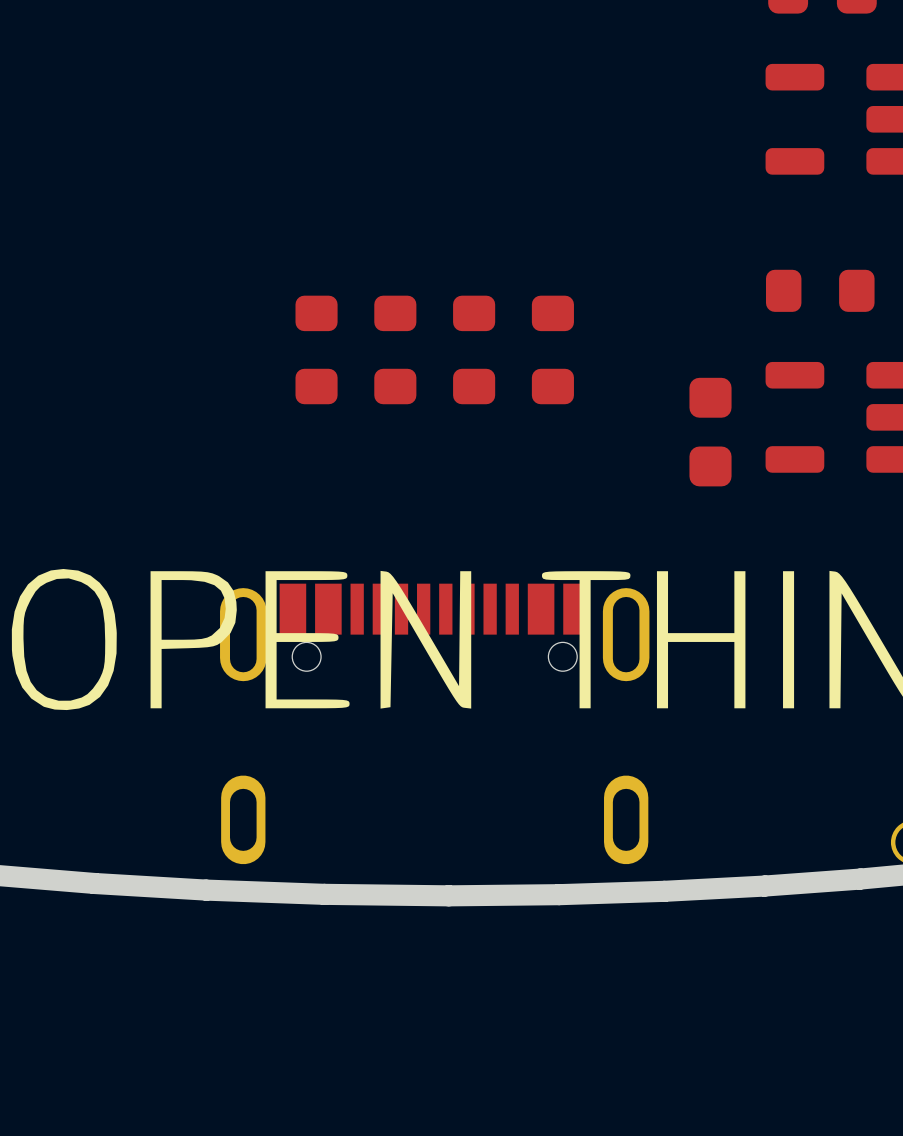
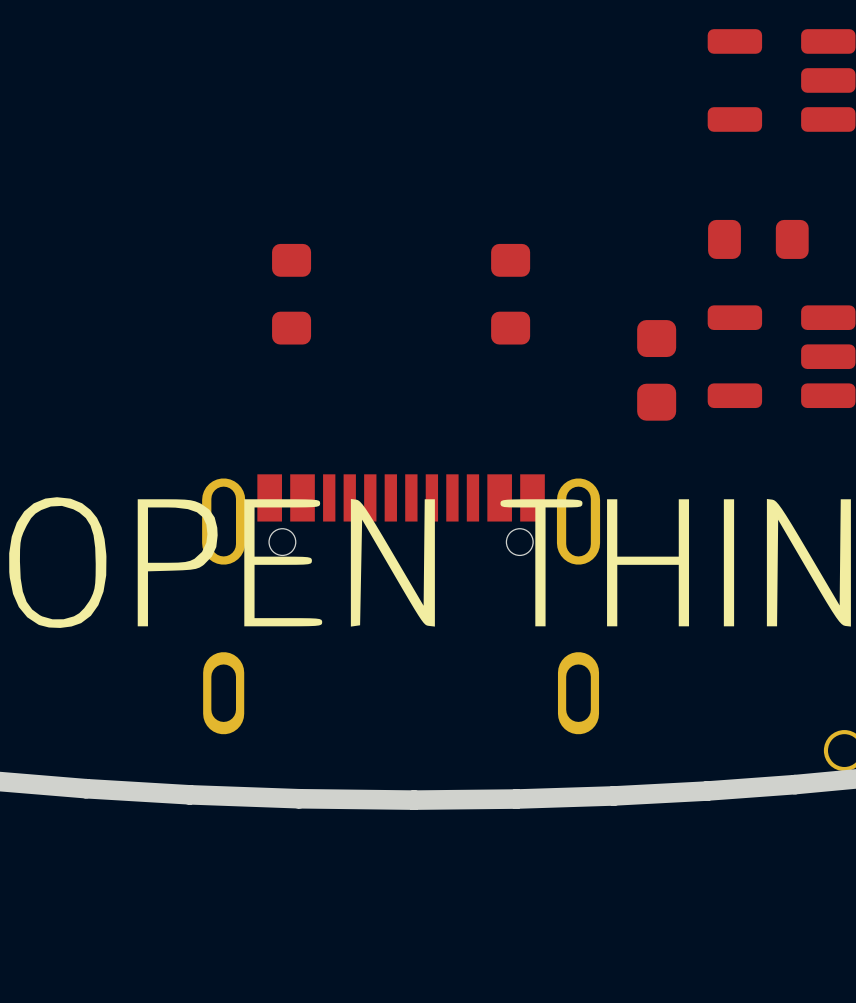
part: (395, 349) -> none
part: (474, 349) -> none
part position: (434, 723) -> (401, 604)

